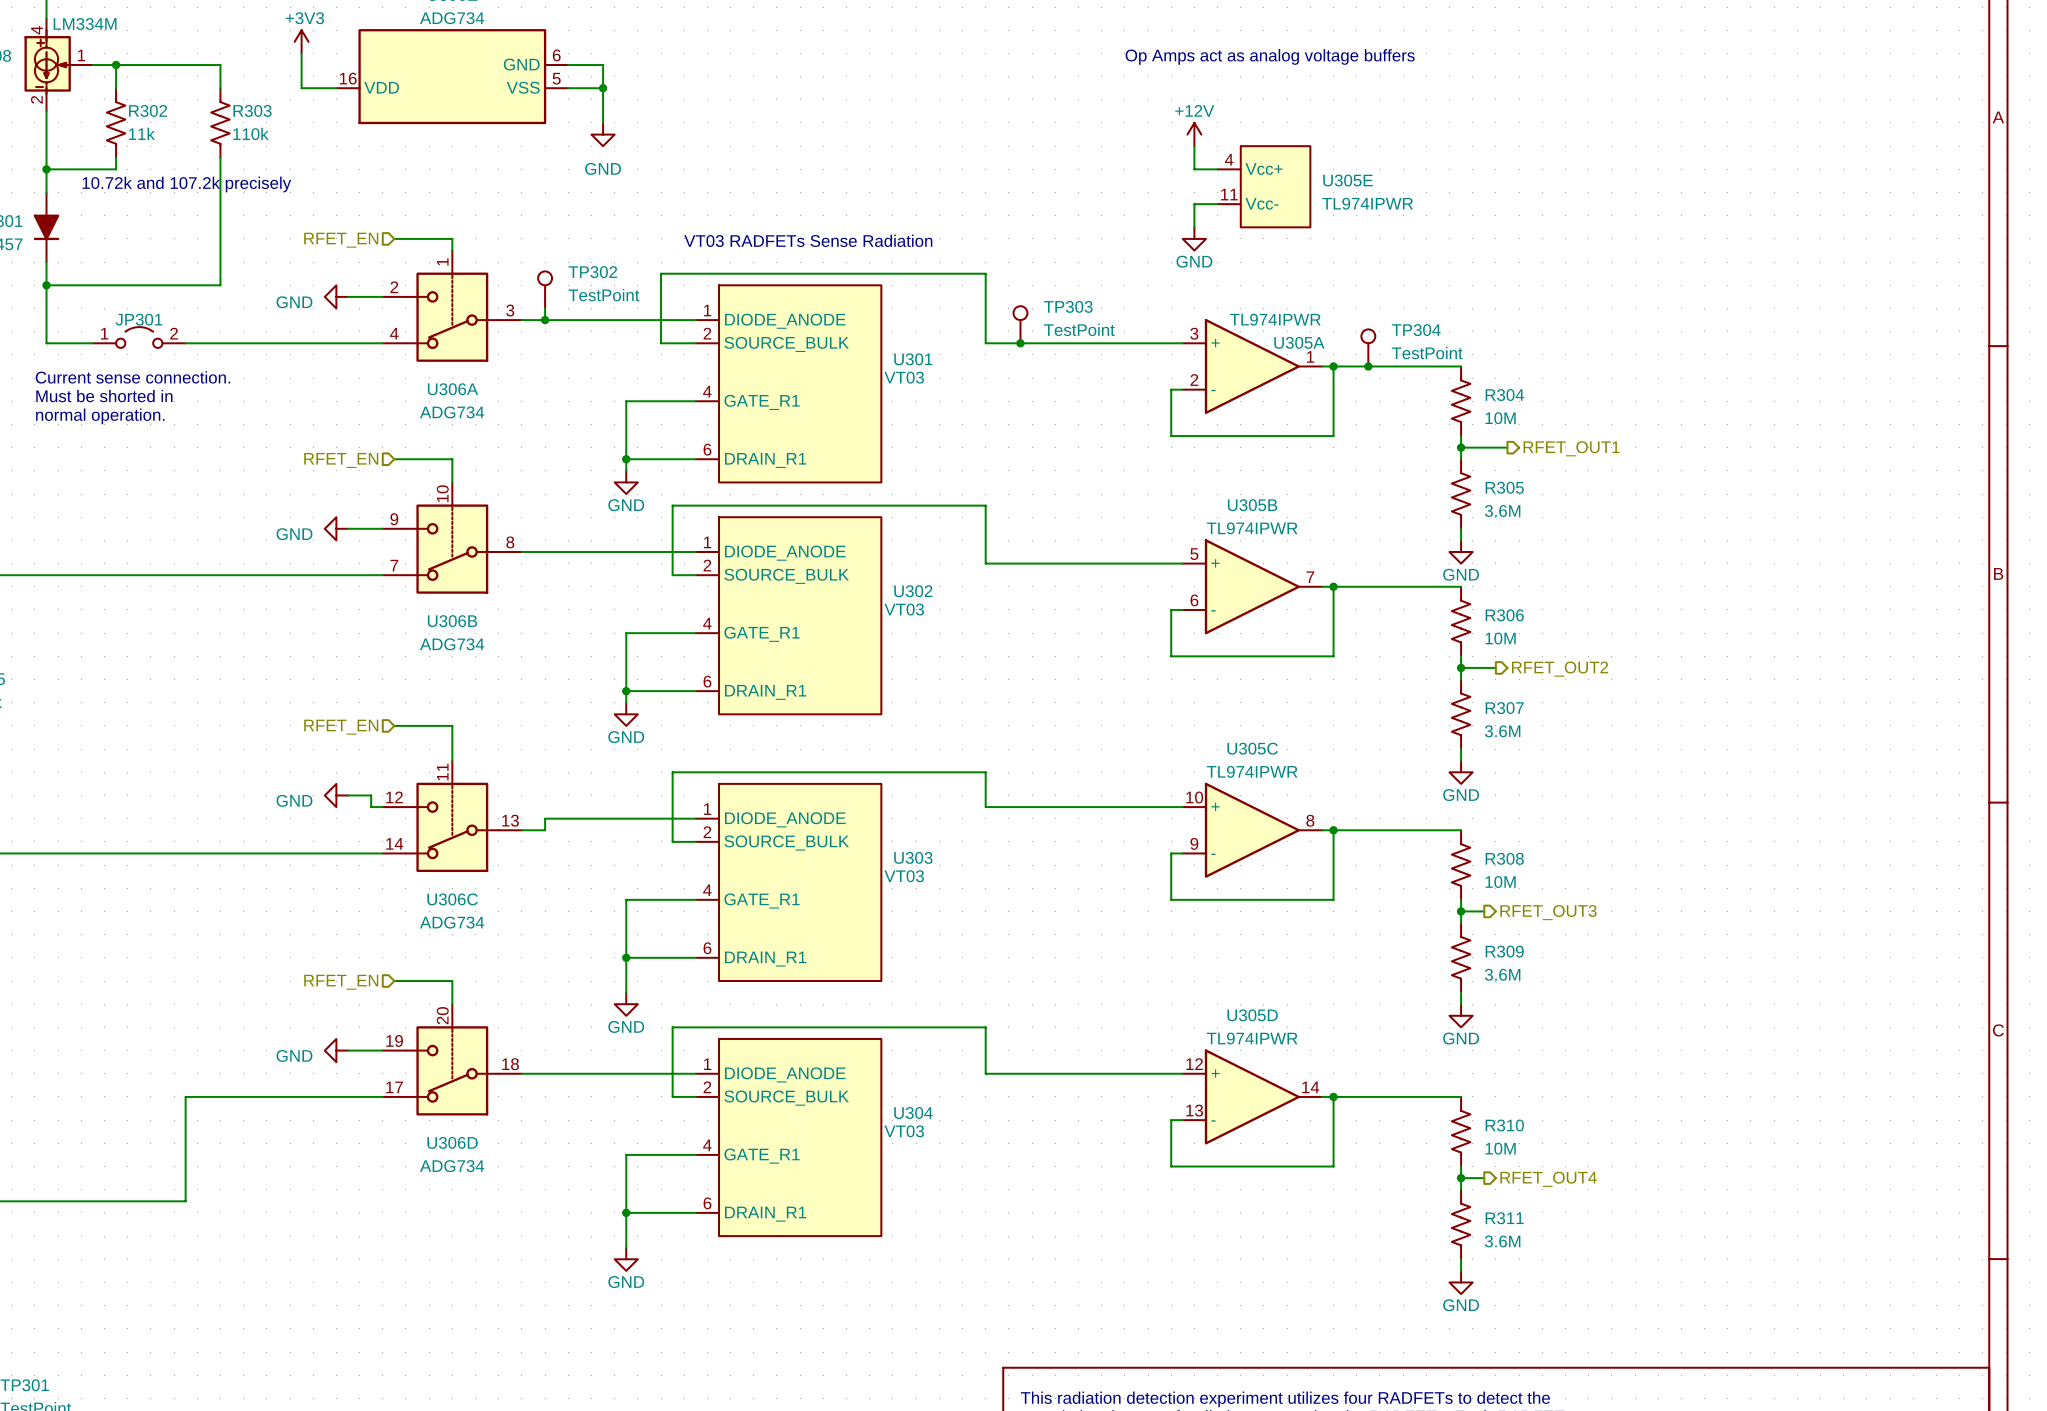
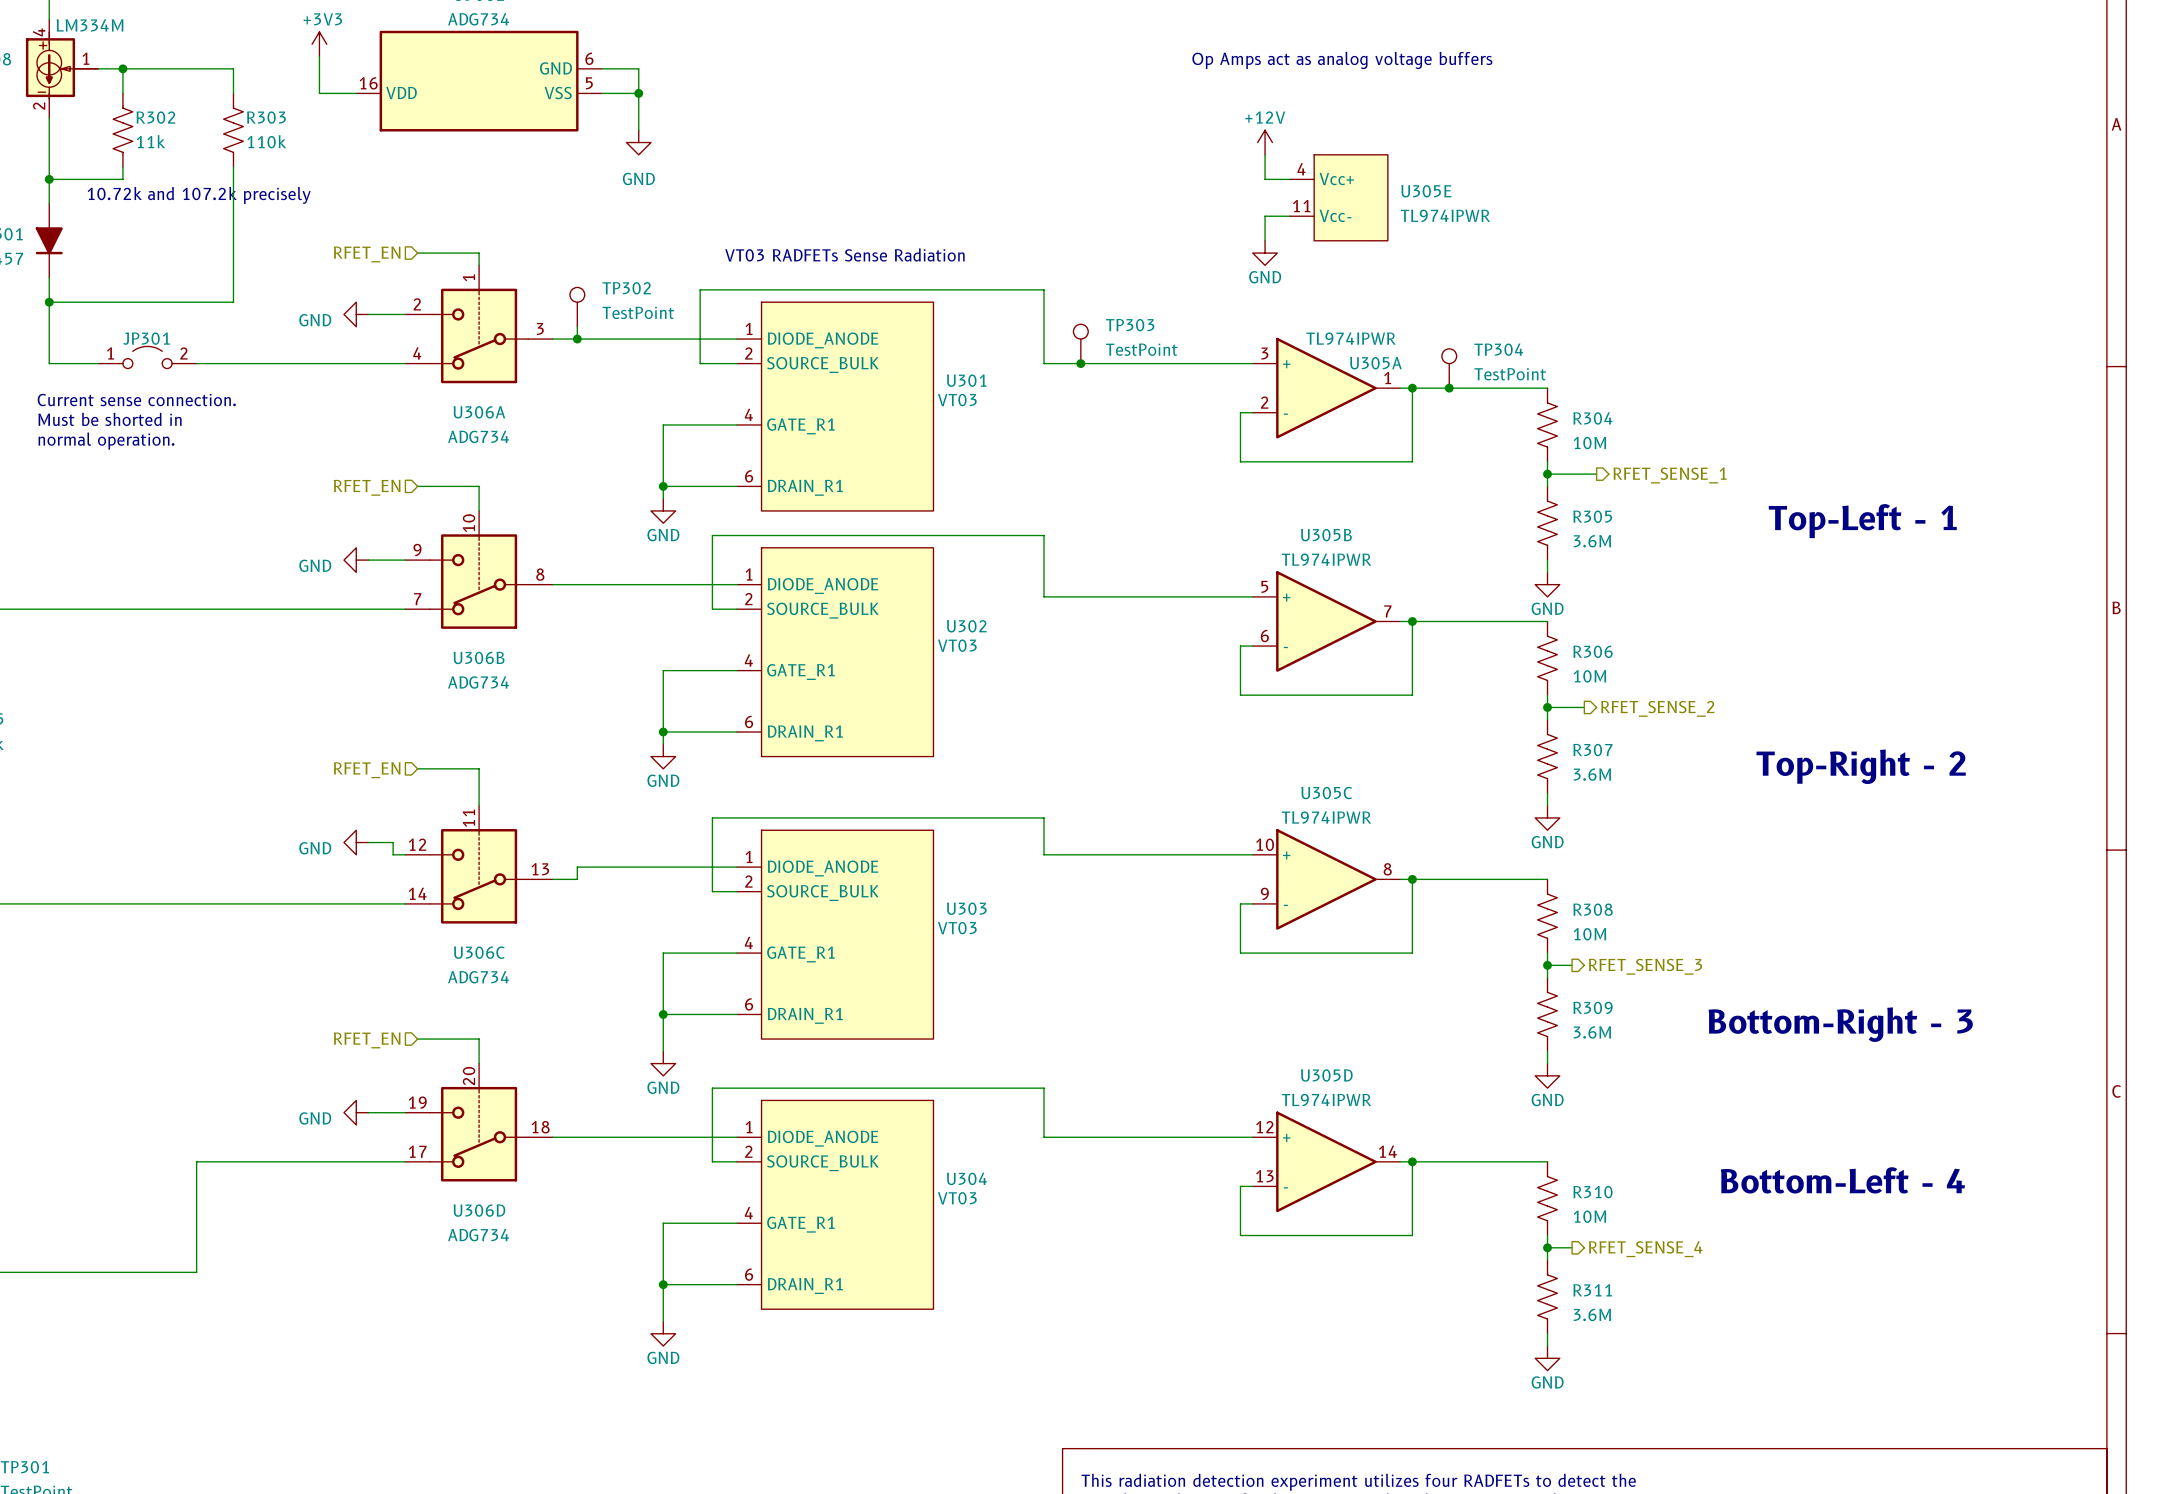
hierarchical label: RFET_OUT1 (1571, 448) -> RFET_SENSE_1 (1670, 475)
text: none -> Top-Left - 1 (1862, 521)
hierarchical label: RFET_OUT2 (1560, 669) -> RFET_SENSE_2 (1657, 708)
text: none -> Top-Right - 2 (1861, 766)
hierarchical label: RFET_OUT3 (1548, 912) -> RFET_SENSE_3 (1645, 966)
text: none -> Bottom-Right - 3 (1840, 1024)
text: none -> Bottom-Left - 4 (1842, 1180)
hierarchical label: RFET_OUT4 (1548, 1179) -> RFET_SENSE_4 (1645, 1249)

